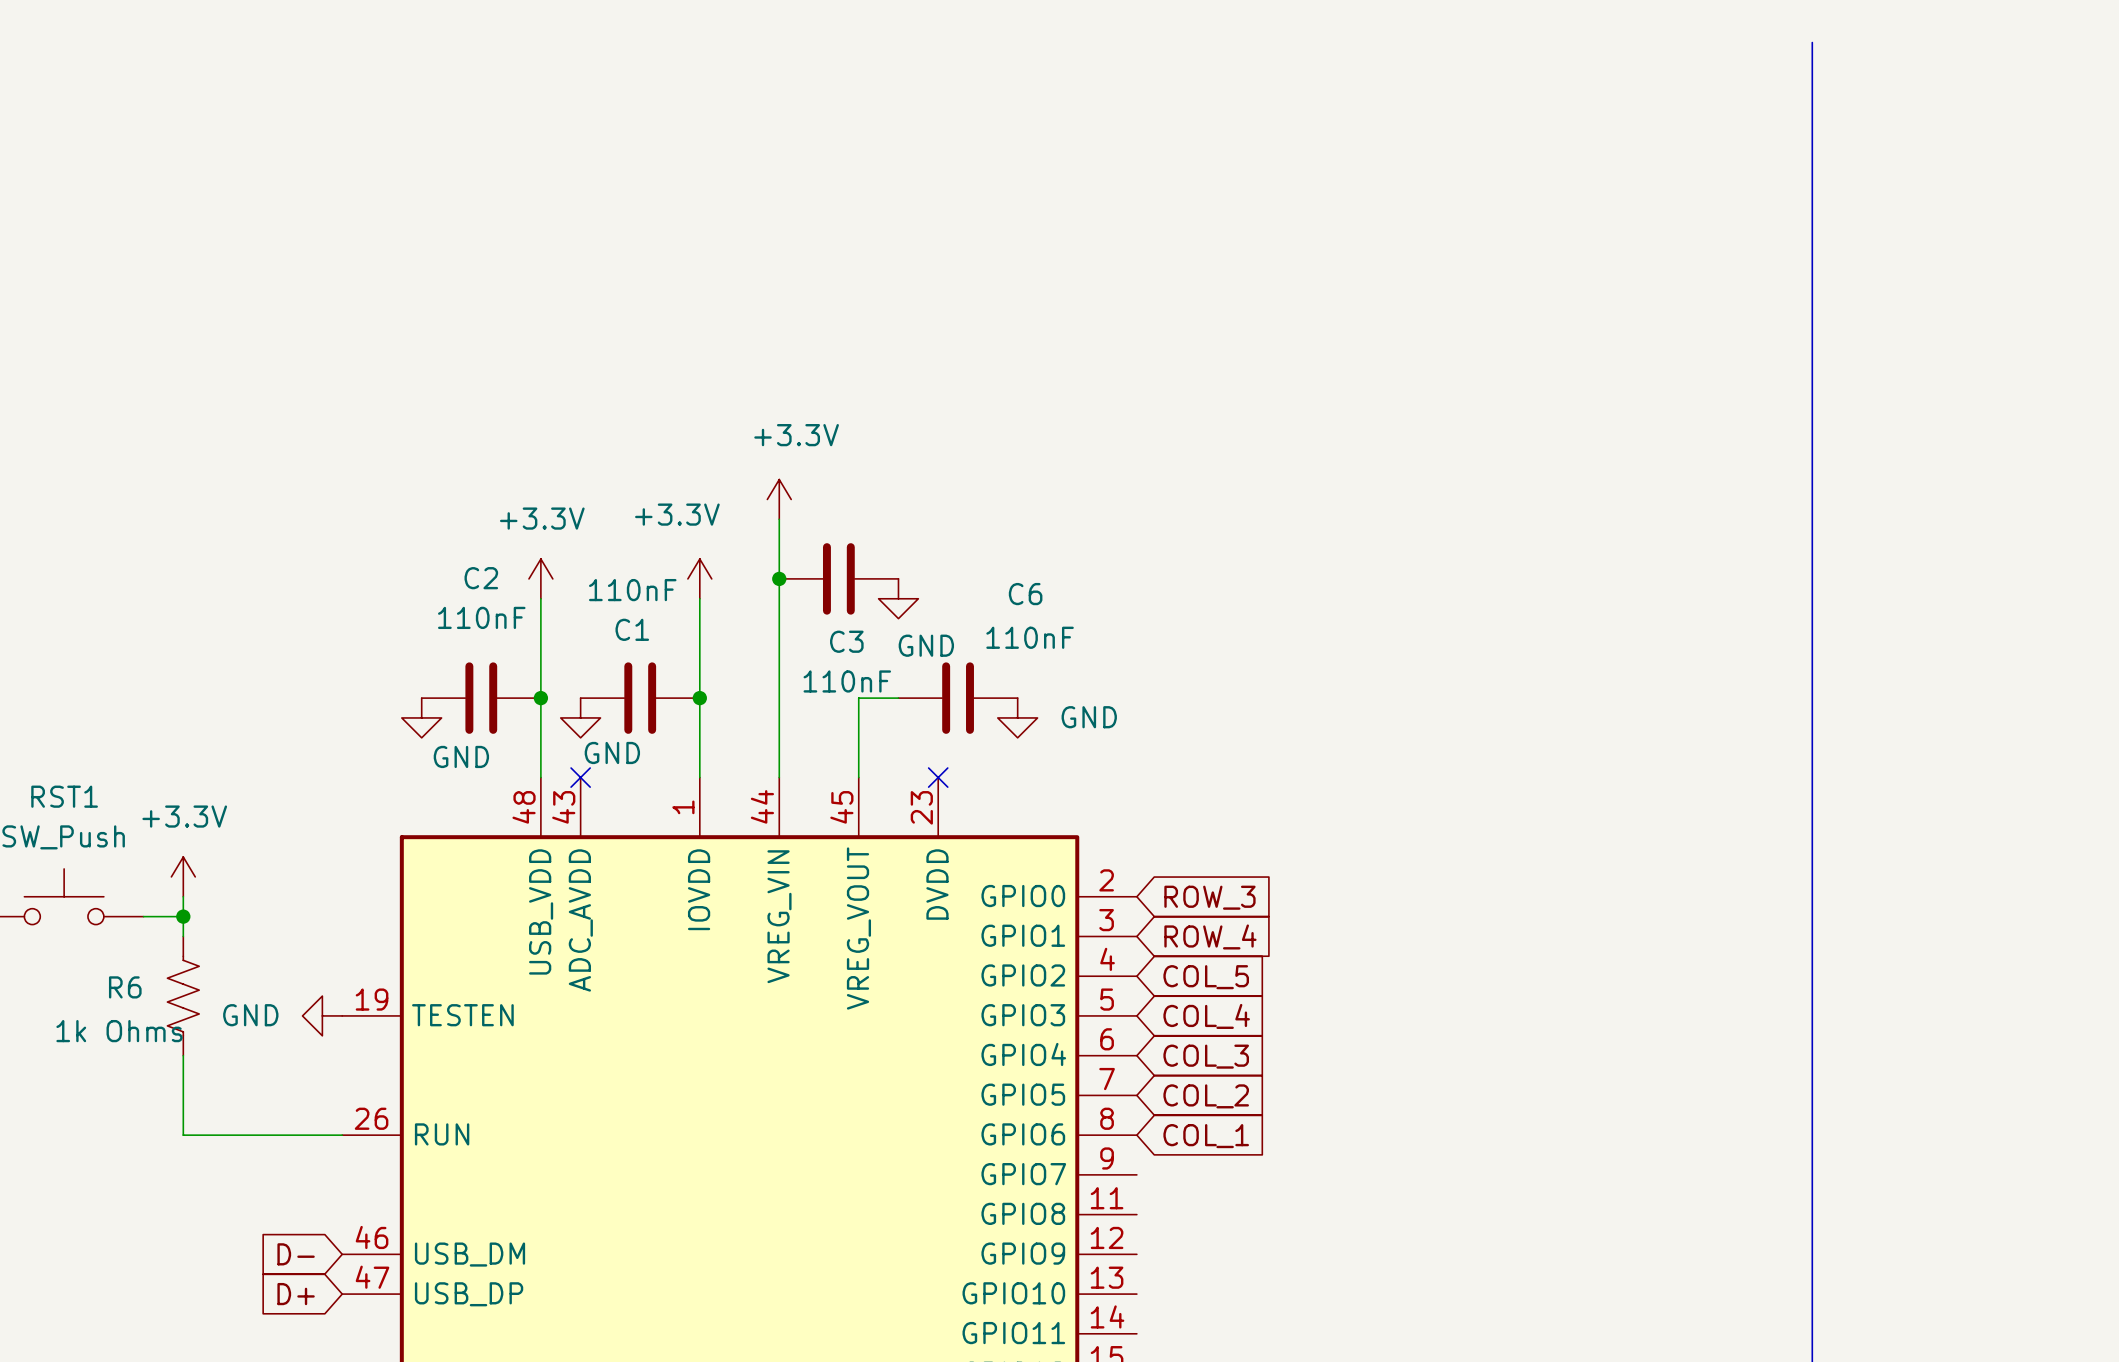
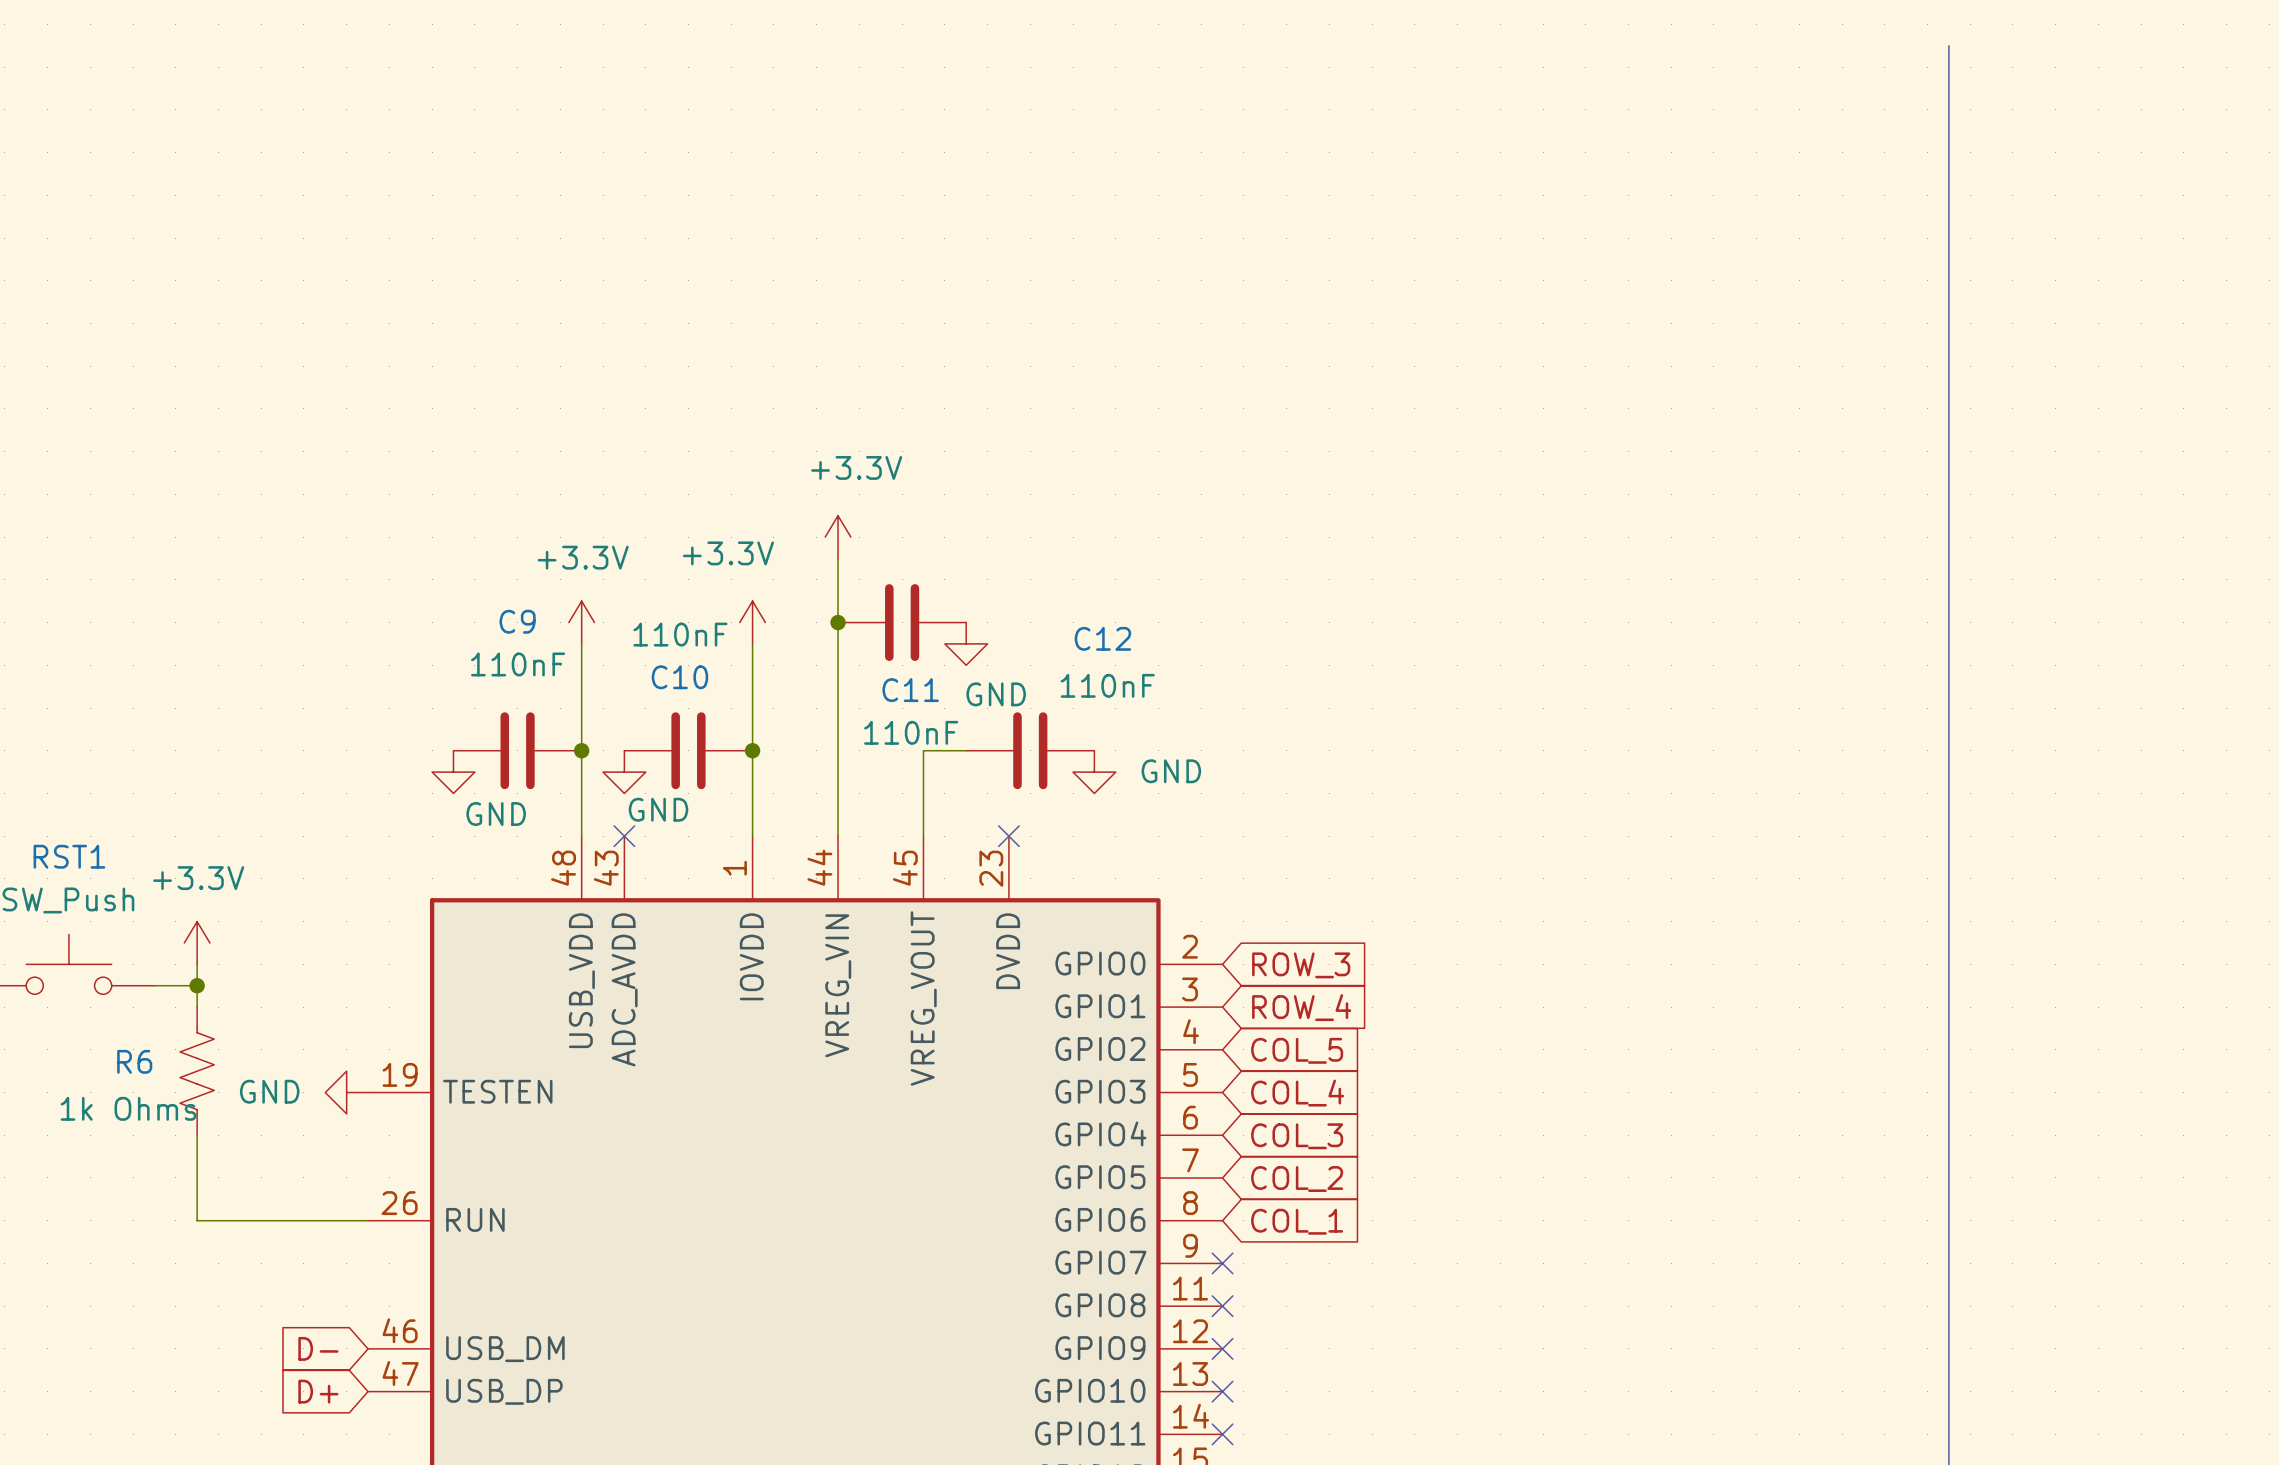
C2 name: C2 (481, 578) -> C9 (517, 621)
C6 name: C6 (1025, 594) -> C12 (1102, 638)
C1 name: C1 (632, 629) -> C10 (679, 677)
C3 name: C3 (846, 641) -> C11 (910, 690)
no-connect mark: none -> (1222, 1263)
no-connect mark: none -> (1222, 1306)
no-connect mark: none -> (1222, 1348)
no-connect mark: none -> (1222, 1391)
no-connect mark: none -> (1222, 1434)

